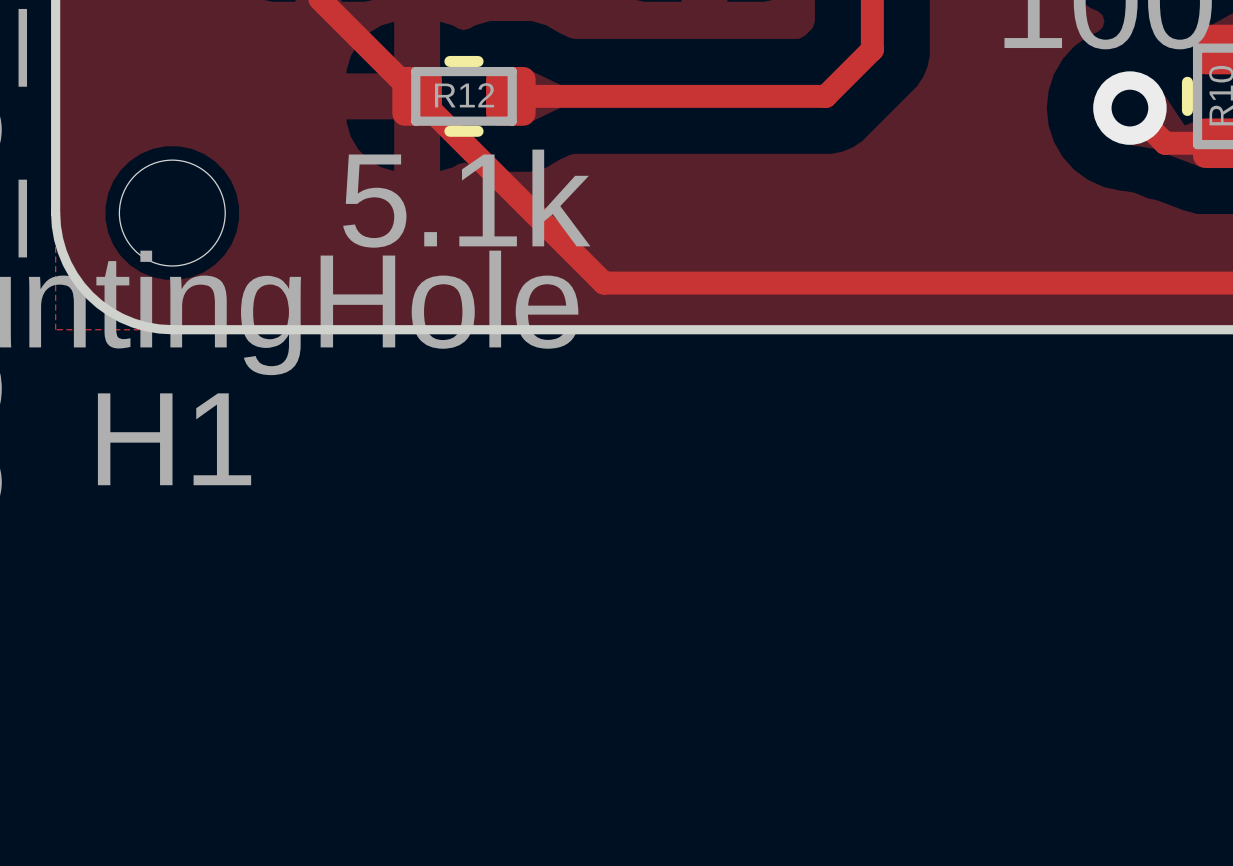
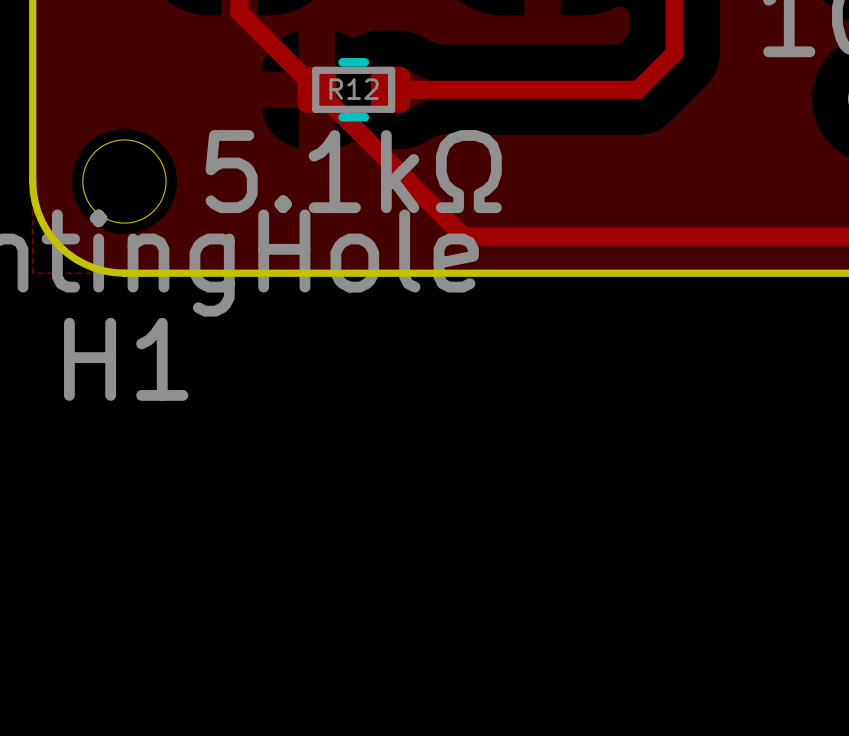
R12 value: 5.1k (466, 198) -> 5.1kΩ (353, 171)

